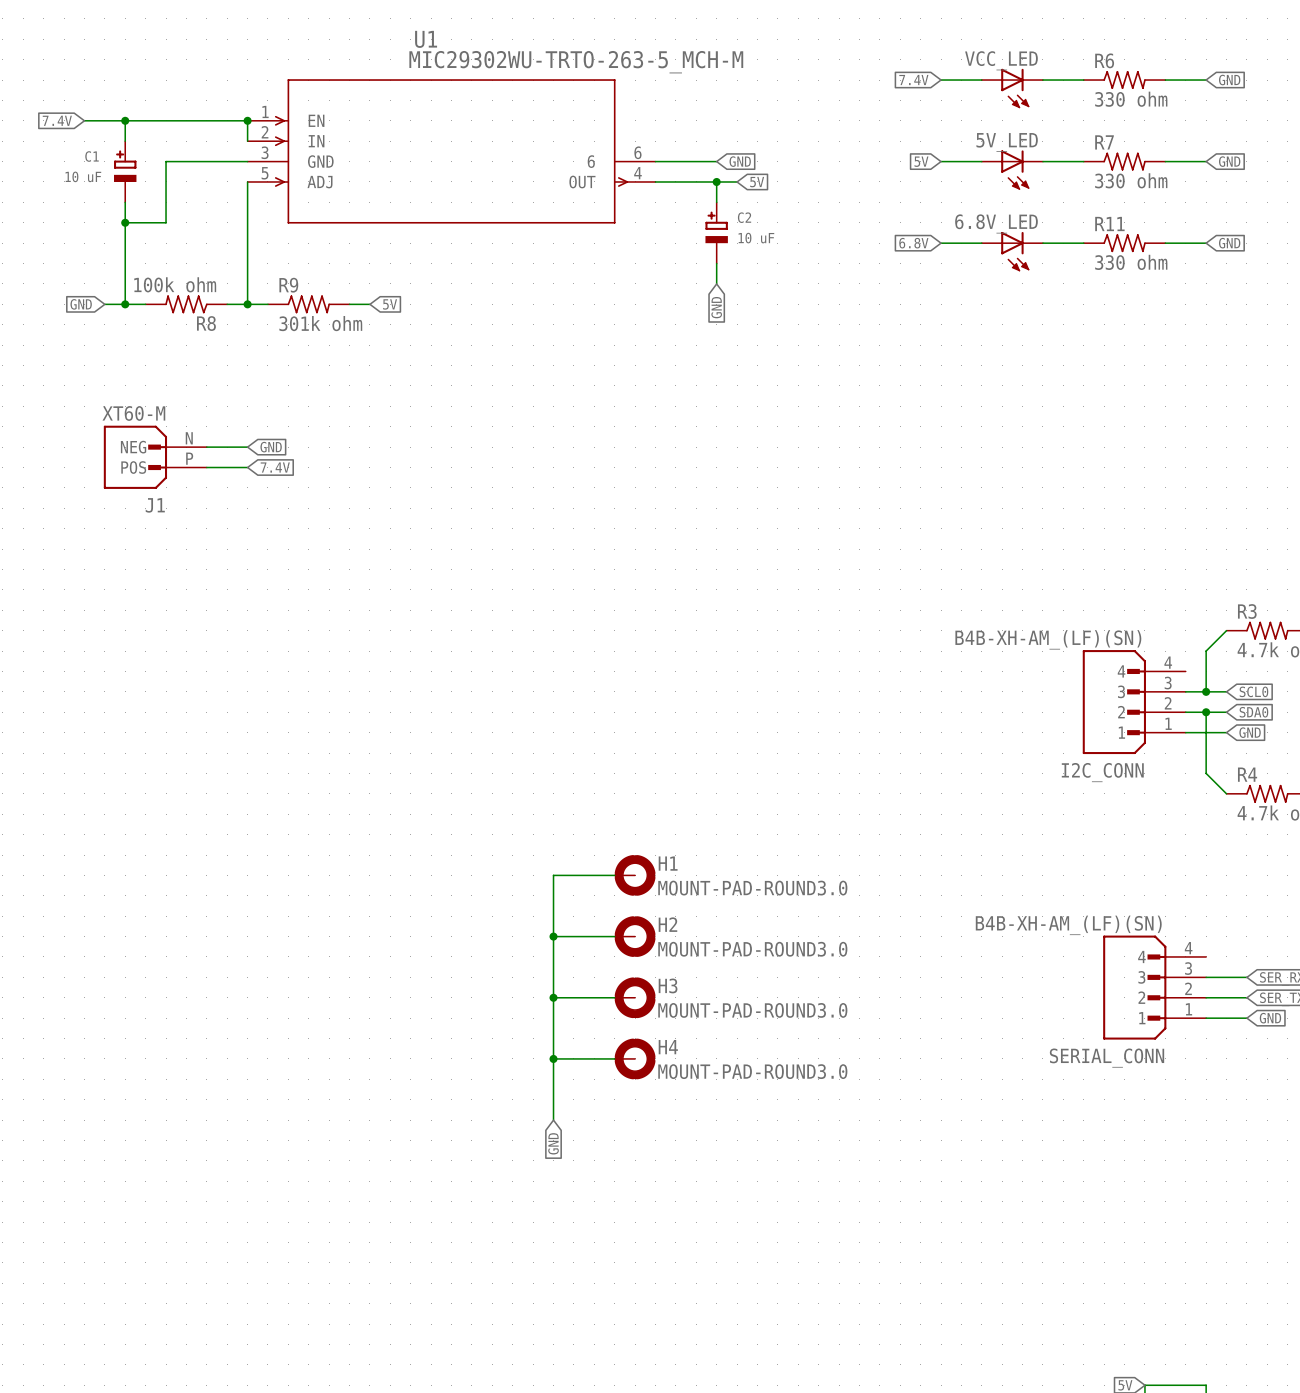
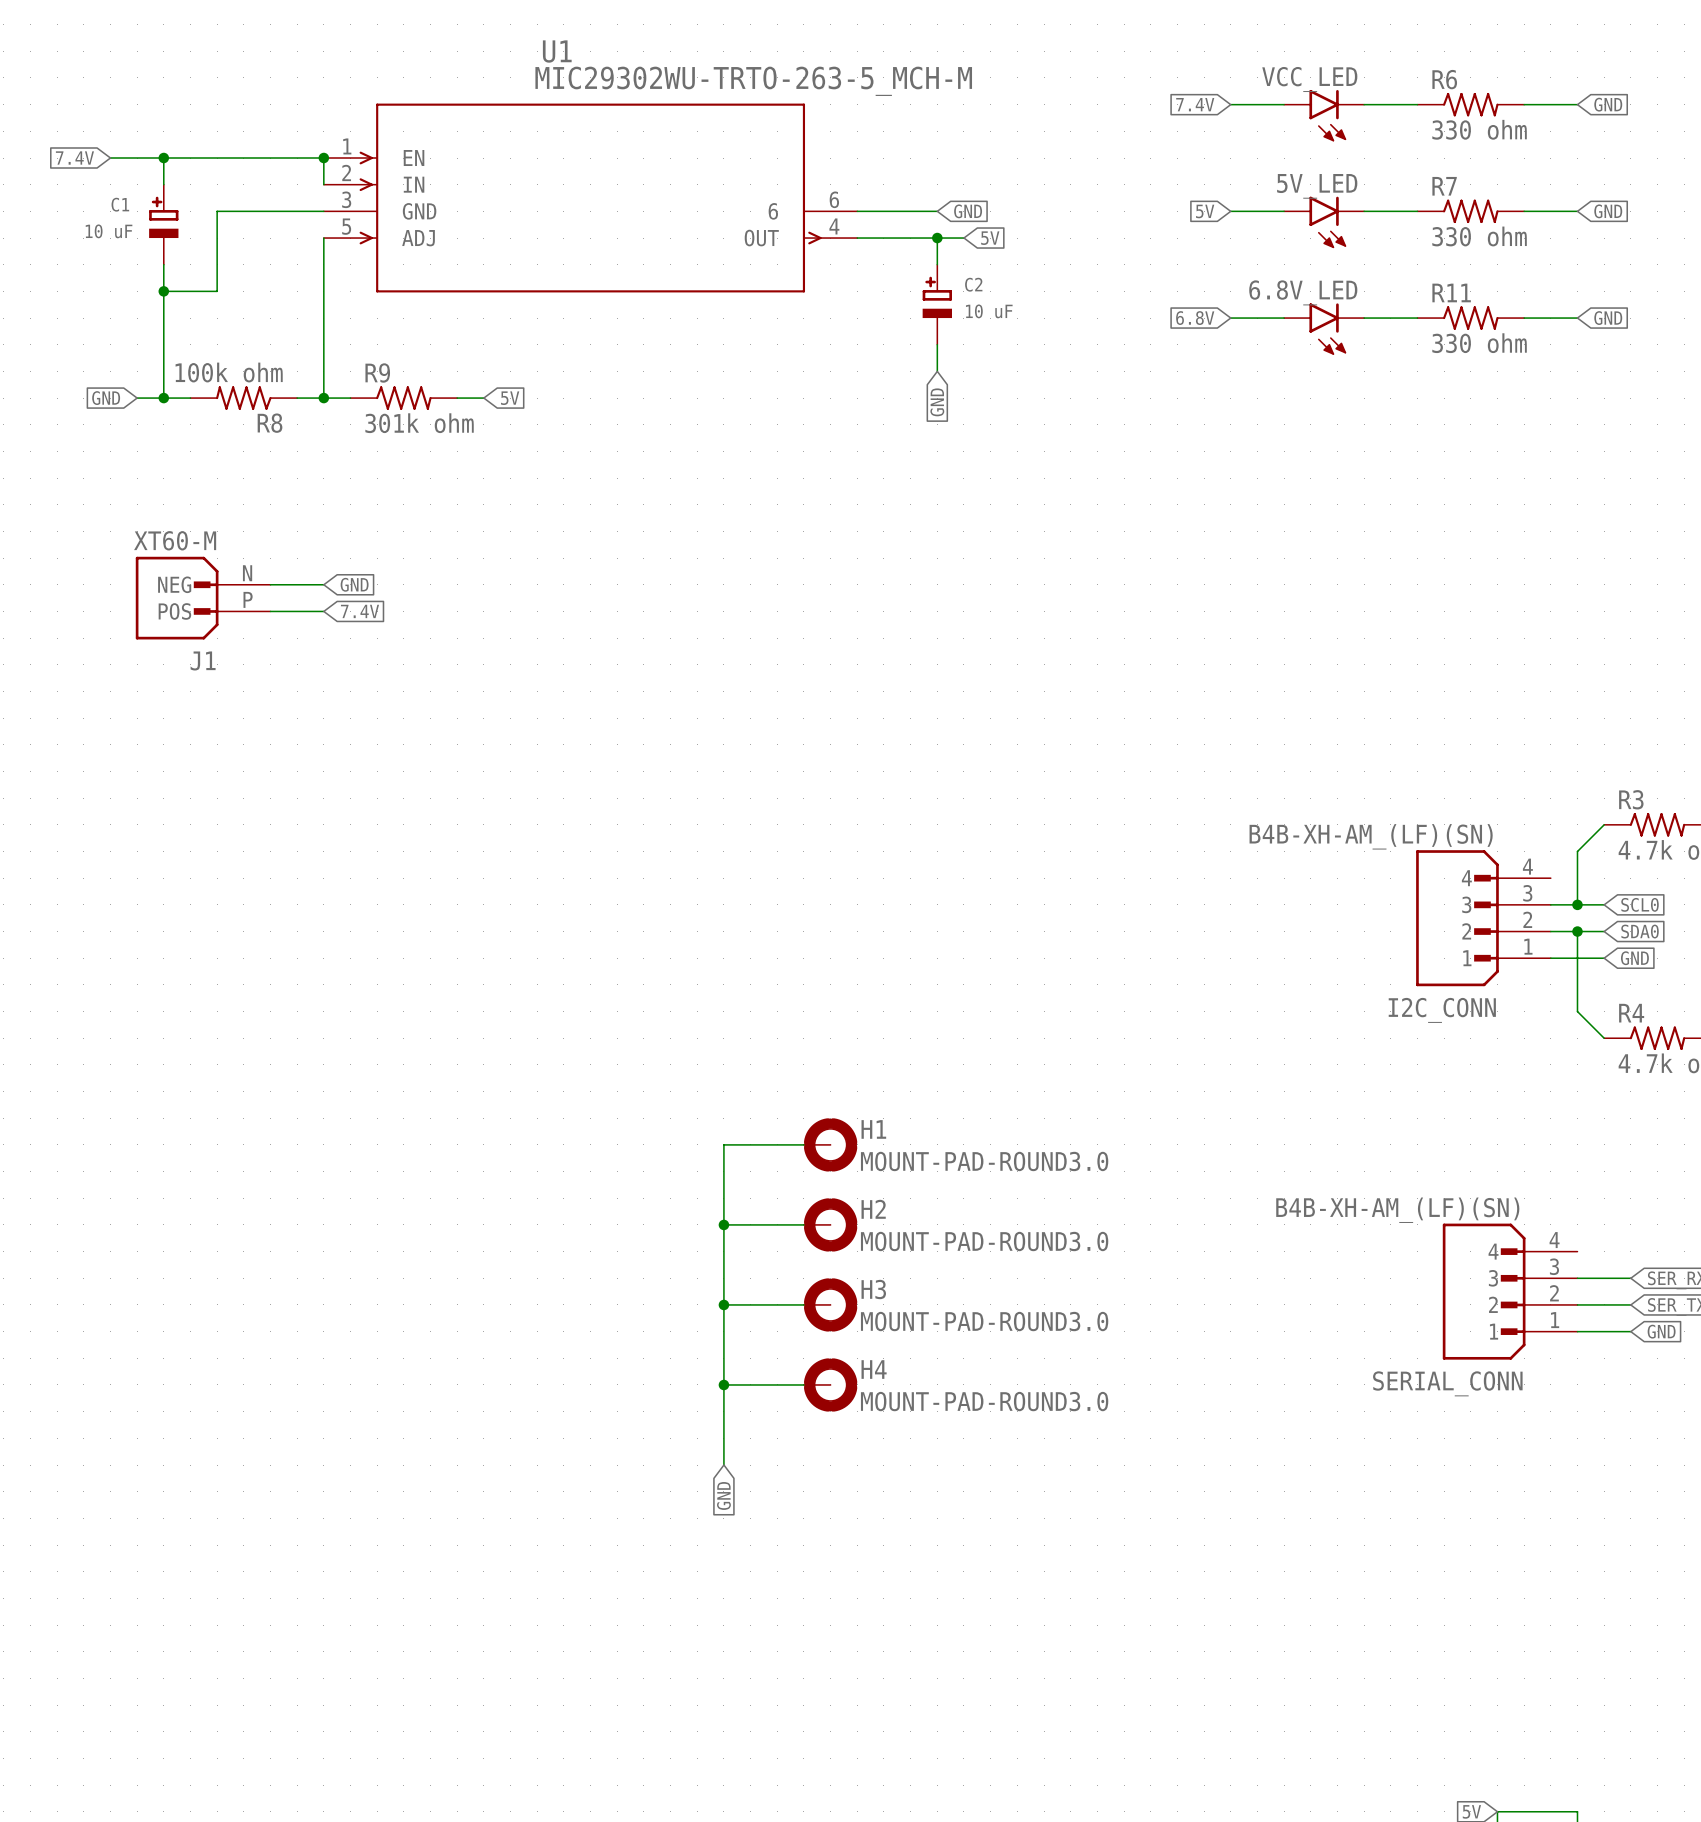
VCC_LED symbol: [981, 68, 1043, 109] -> [1284, 89, 1365, 142]
5V_LED symbol: [981, 150, 1043, 190] -> [1284, 196, 1365, 249]
6.8V_LED symbol: [981, 231, 1043, 272] -> [1284, 303, 1365, 355]

